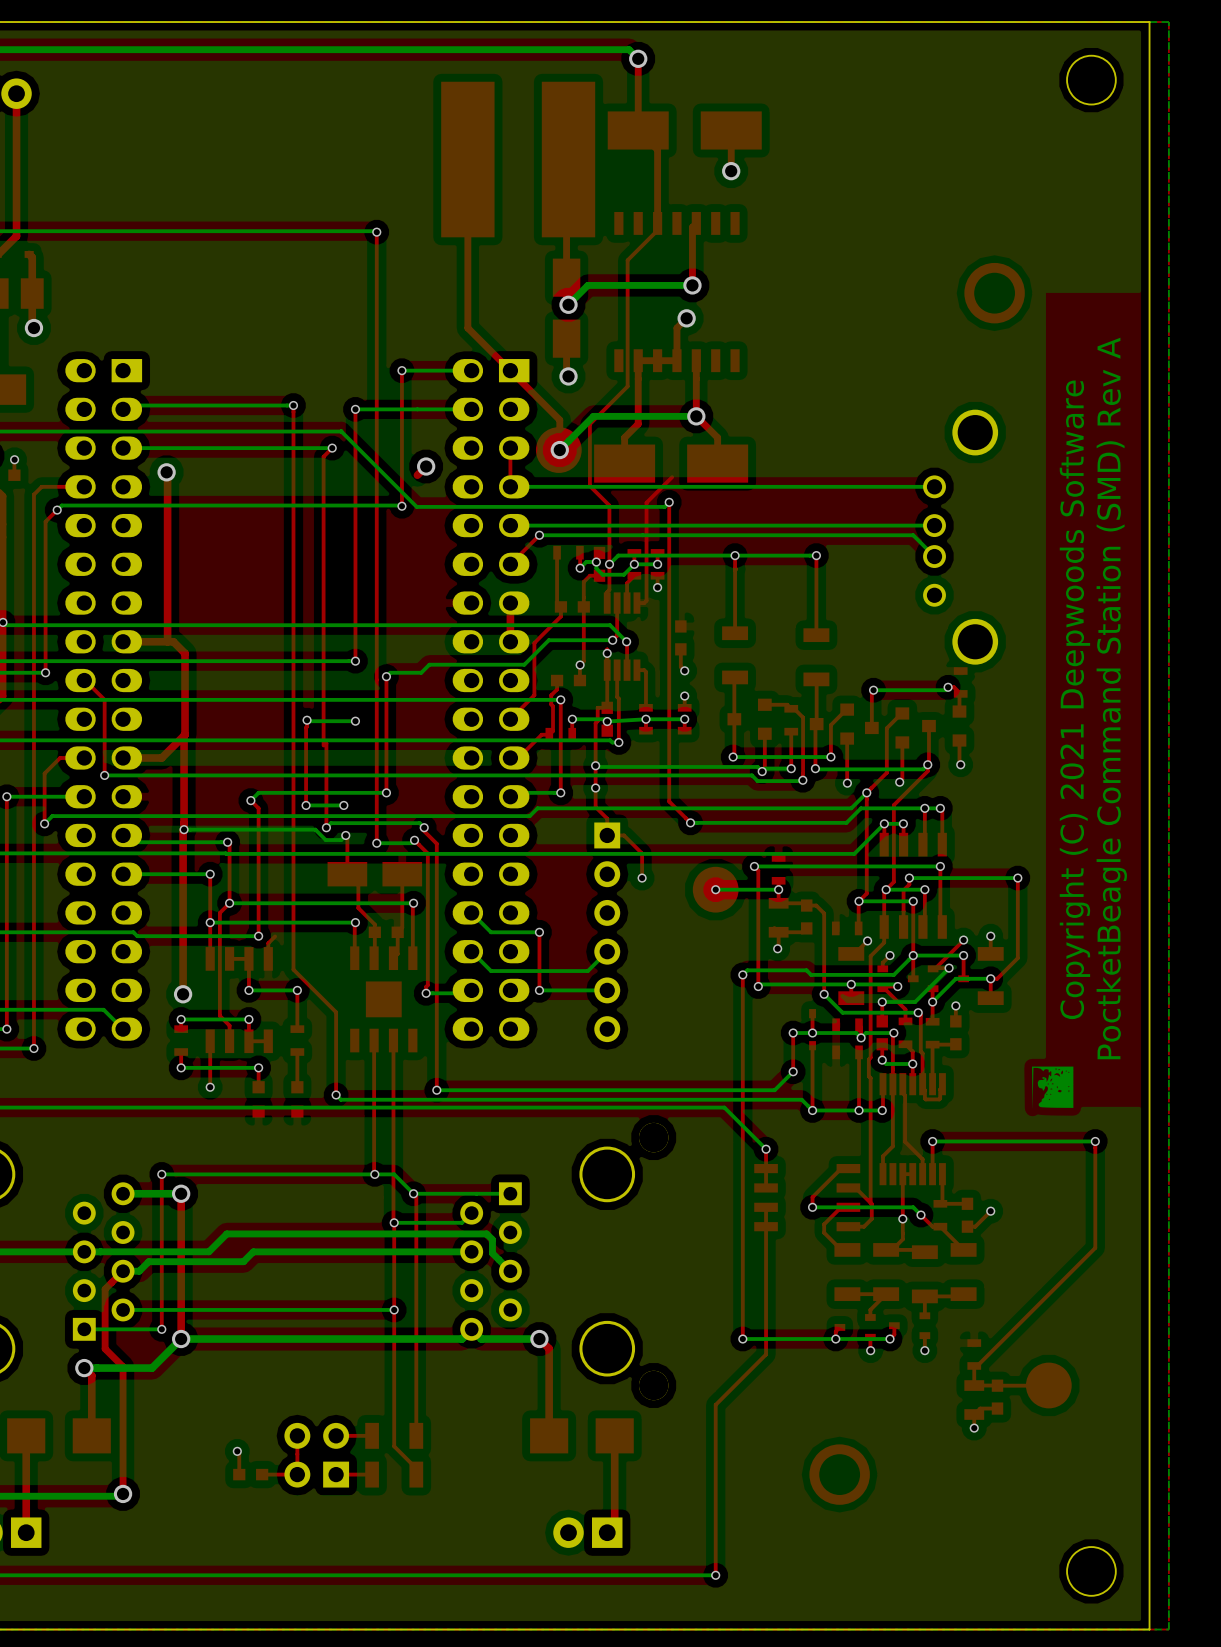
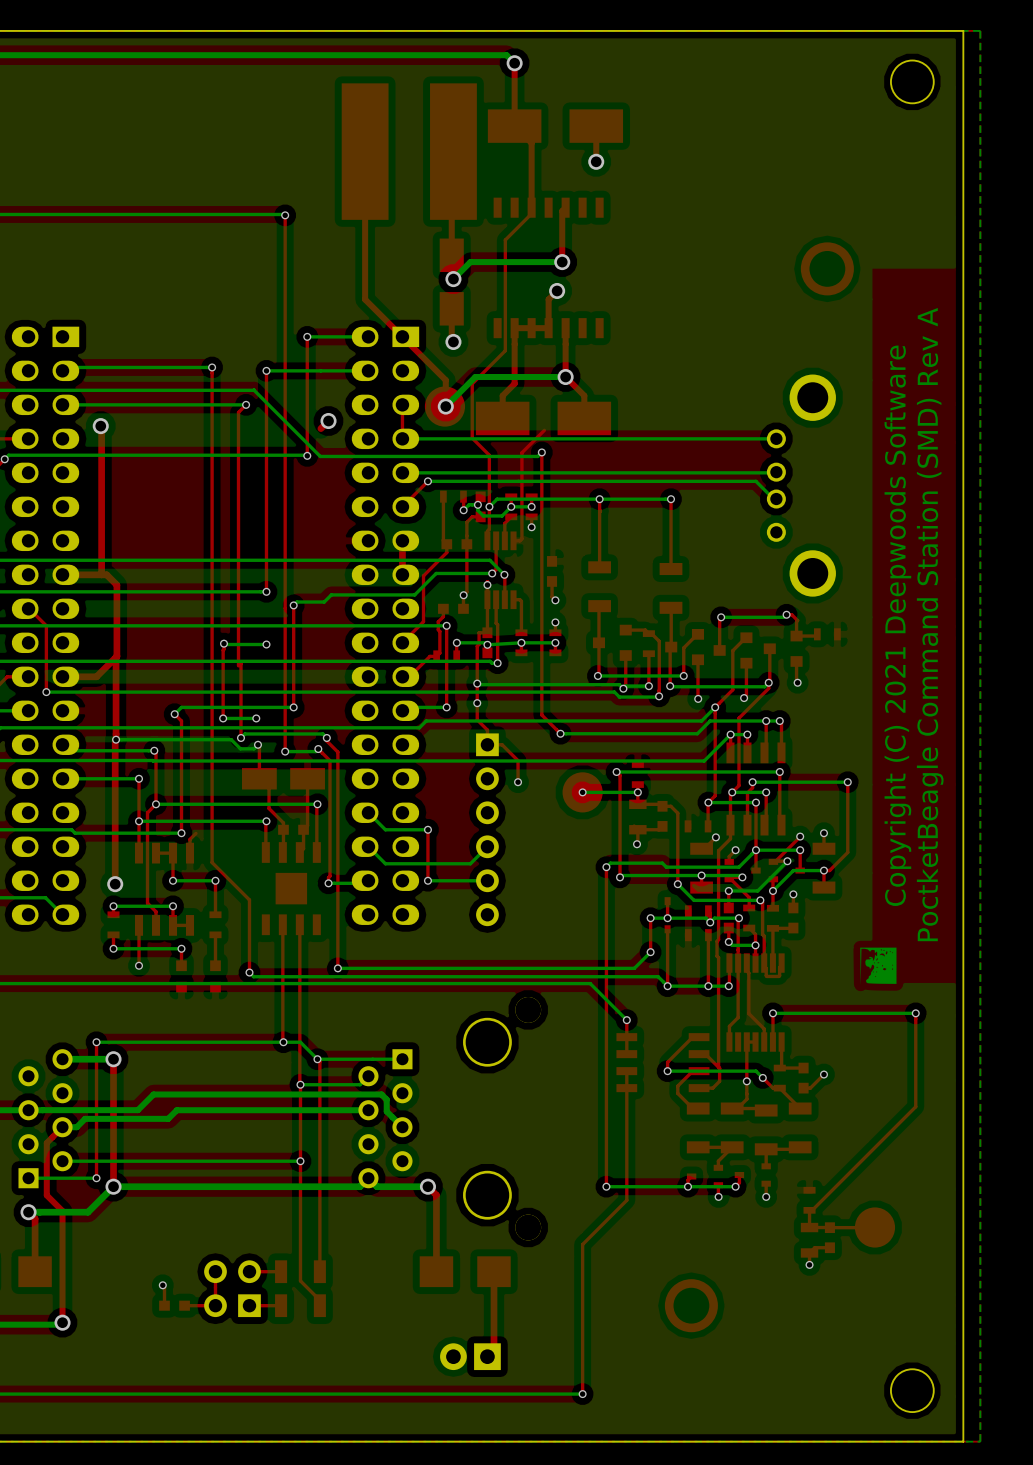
part footprint: [923, 409, 999, 665] -> [766, 374, 836, 597]
part rotation: 0° (960, 682) -> 90° clockwise (827, 634)
part position: (960, 682) -> (827, 634)
top track: none -> (817, 634) (815, 636) (796, 636)

